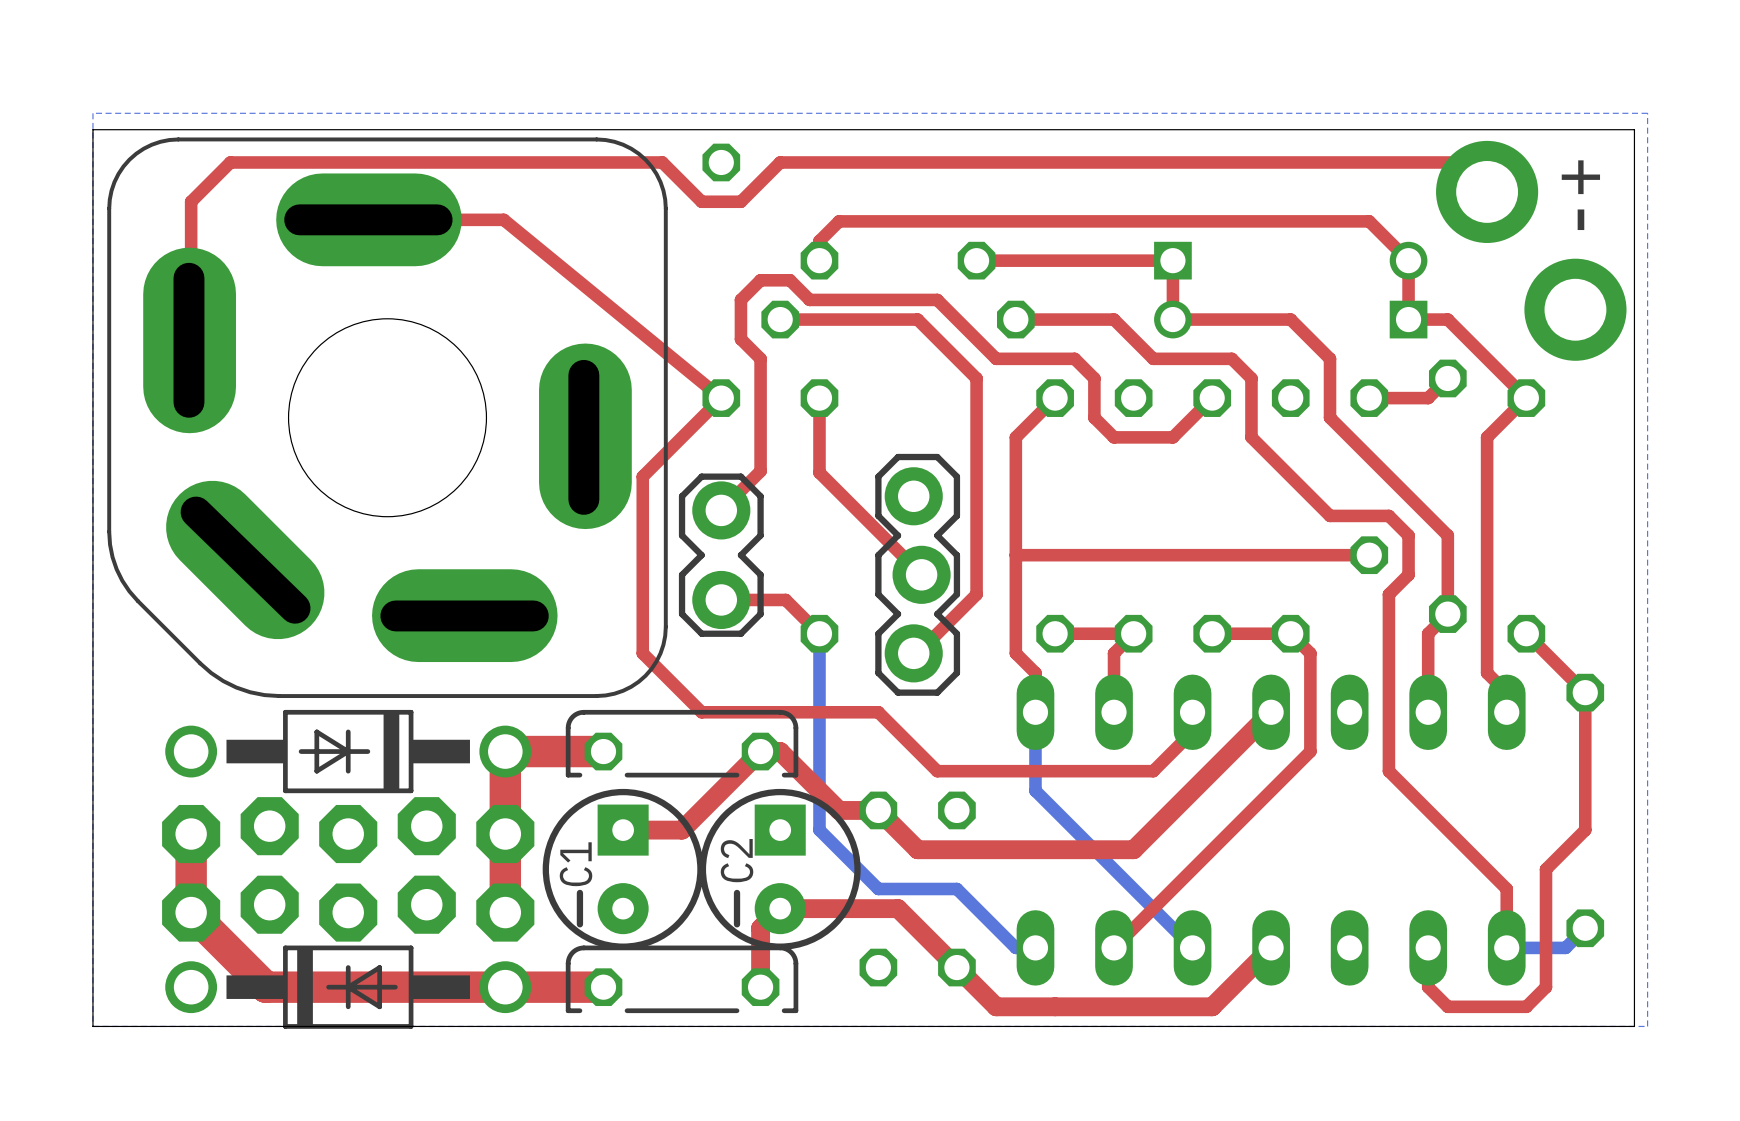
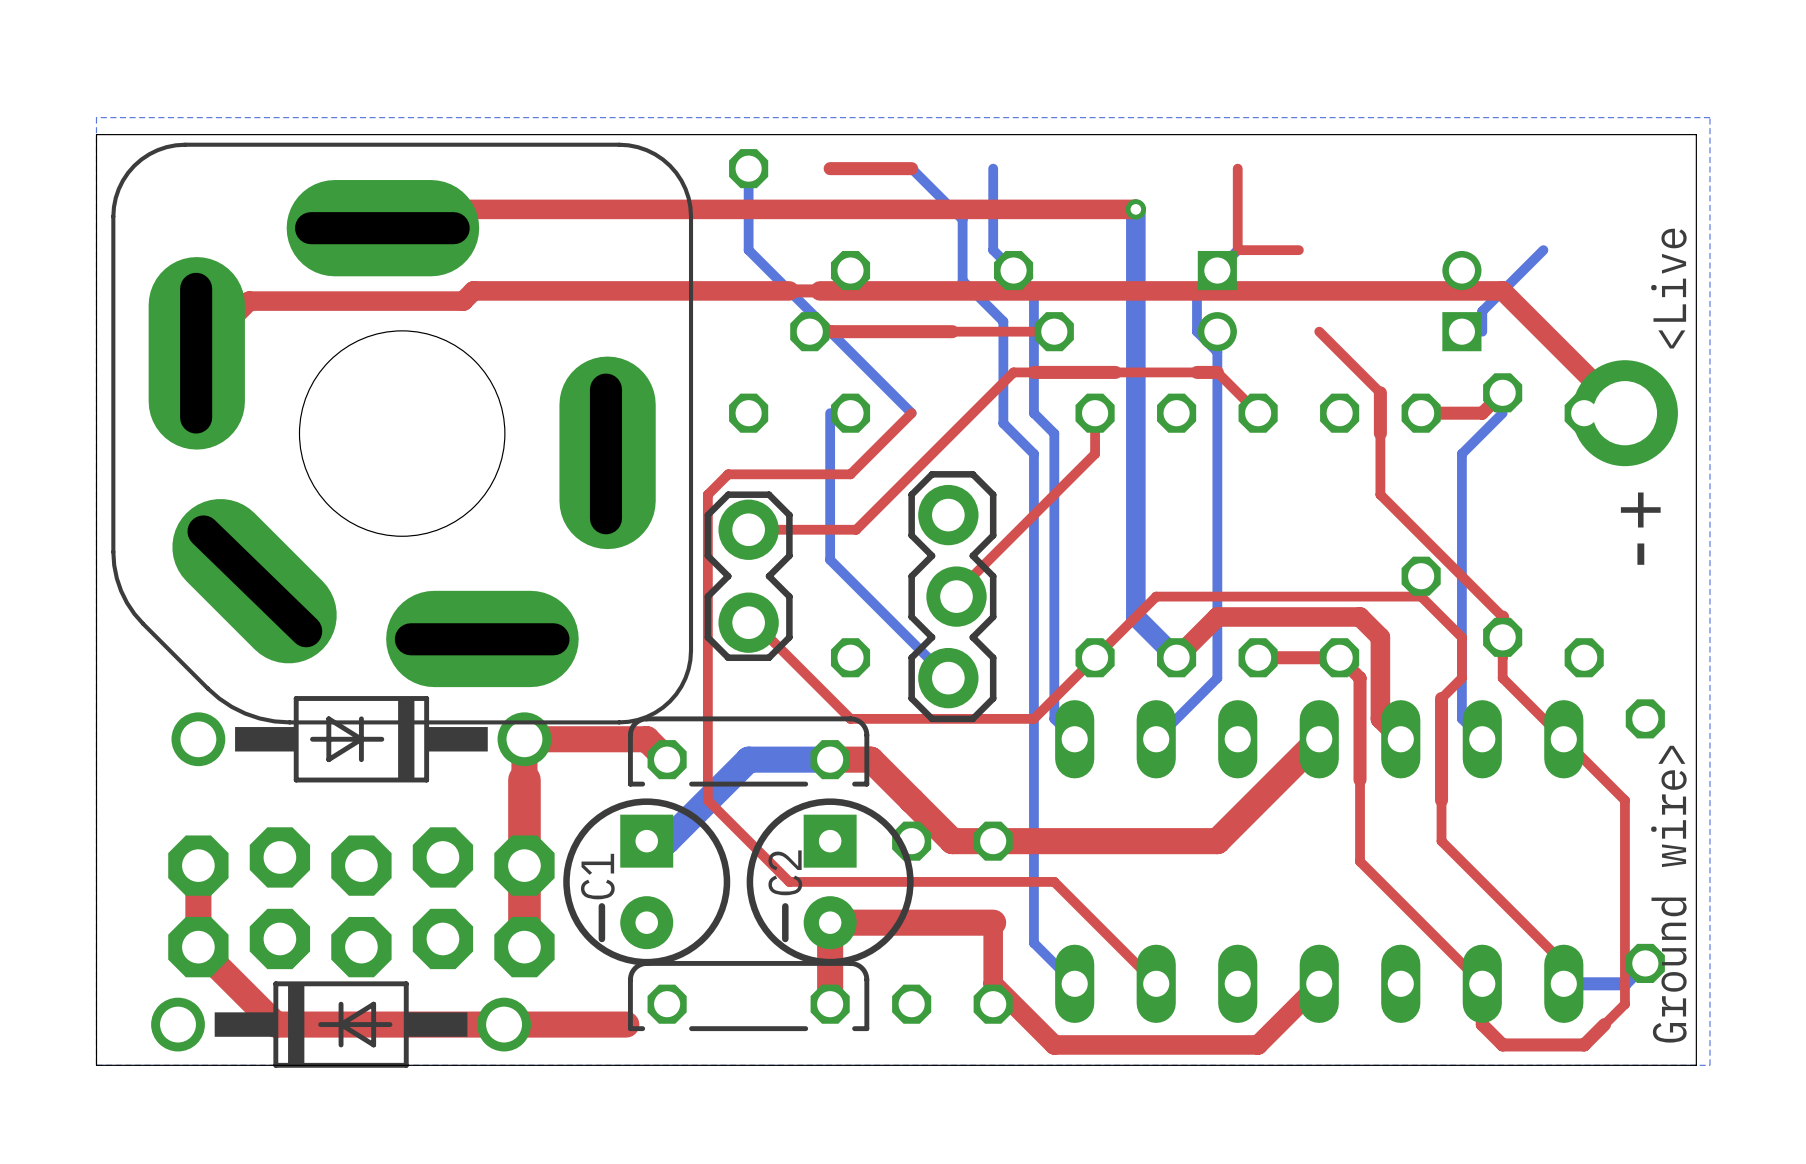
bottom track: none -> (748, 168) (748, 250) (911, 413)
top track: (799, 162) (780, 162) (740, 201) -> (1135, 209) (769, 209)
top track: (878, 162) (1457, 162) (1487, 191) -> none
top track: none -> (1237, 168) (1237, 250) (1298, 250)
part: (1487, 191) -> none
text position: -+ (1580, 195) -> -+ (1640, 528)
top track: (701, 201) (662, 162) (230, 162) (191, 201) (191, 338) (189, 340) -> (789, 290) (473, 290) (463, 301) (249, 301) (197, 353)
top track width: thin (701, 201) (740, 201) -> thick (728, 209) (769, 209)
bottom track: none -> (1135, 209) (1135, 616) (1176, 657)
via: none -> (1135, 209)
top track: (368, 219) (503, 219) (721, 398) (642, 476) (642, 653) (701, 712) (878, 712) (937, 771) (1153, 771) (1192, 731) (1192, 712) -> (383, 228) (402, 209) (728, 209)
bottom track: none -> (1237, 250) (1196, 290) (1196, 331) (1217, 352) (1217, 678) (1156, 739)
bottom track: none -> (1543, 250) (1482, 311) (1482, 331)
top track: (819, 260) (819, 241) (839, 221) (1369, 221) (1408, 260) (1408, 319) (1447, 319) (1526, 398) (1487, 437) (1487, 673) (1506, 692) (1506, 712) -> none
top track: (976, 260) (1172, 260) (1172, 319) (1290, 319) (1330, 358) (1330, 378) -> (1319, 331) (1380, 392)
text: none -> <Live (1668, 288)
top track: (760, 280) (740, 299) (740, 339) (760, 358) (760, 471) (721, 510) -> none
top track: (790, 280) (809, 299) (937, 299) (996, 358) -> (748, 529) (856, 529) (1013, 372) (1033, 372)
top track: none -> (819, 290) (1502, 290) (1624, 413)
part position: (1575, 309) -> (1624, 413)
top track: (917, 319) (976, 378) (976, 594) (917, 653) (913, 653) -> (952, 331) (1033, 331)
top track: (1015, 319) (1114, 319) (1153, 358) -> (1115, 372) (1196, 372)
top track: (1074, 358) (1094, 378) (1094, 417) (1114, 437) (1172, 437) (1212, 398) -> (1217, 372) (1258, 413)
top track: (1172, 358) (1231, 358) (1251, 378) (1251, 437) (1330, 515) (1388, 515) (1408, 535) (1408, 574) (1388, 594) (1388, 673) -> (754, 622) (850, 718) (1033, 718) (1156, 596) (1421, 596) (1461, 637) (1461, 678) (1441, 698)
bottom track: none -> (830, 413) (830, 559) (948, 678)
top track: (819, 398) (819, 472) (921, 574) -> none
top track: (1055, 398) (1015, 437) (1015, 653) (1035, 673) (1035, 712) -> (1095, 413) (1095, 453) (952, 596) (956, 596)
bottom track: none -> (1502, 413) (1461, 453) (1461, 718) (1482, 739)
top track: (1330, 417) (1447, 535) (1447, 594) -> (1380, 433) (1380, 494) (1502, 616)
top track: (1015, 555) (1369, 555) -> none
top track: (726, 599) (785, 599) (819, 633) -> none
top track: (1447, 614) (1428, 633) (1428, 712) -> none
bottom track: (819, 633) (819, 830) (878, 888) (956, 888) (1015, 947) (1035, 947) -> (911, 168) (962, 219) (962, 280) (1003, 321) (1003, 423) (1033, 453) (1033, 943) (1074, 983)
top track: (1055, 633) (1133, 633) (1114, 653) (1114, 712) -> none
top track: none -> (1176, 657) (1217, 616) (1360, 616) (1380, 637) (1380, 718) (1400, 739)
top track: (1526, 633) (1585, 692) (1585, 830) (1546, 869) (1546, 987) -> (1502, 637) (1502, 678) (1624, 800) (1624, 1004) (1604, 1024)
bottom track: (1035, 712) (1035, 790) (1192, 947) -> (1074, 739) (1054, 718) (1054, 433) (1033, 413) (1033, 290) (993, 250) (993, 168)
top track width: thin (1271, 712) (1172, 810) -> thick (1319, 739) (1217, 841)
top track: none -> (830, 759) (870, 759) (952, 841) (1217, 841)
bottom track: none -> (830, 759) (748, 759) (667, 841) (646, 841)
part position: (682, 743) -> (748, 751)
part position: (348, 751) -> (361, 739)
top track: (505, 751) (603, 751) -> (524, 780) (524, 739) (646, 739) (667, 759)
top track: (1310, 751) (1114, 947) -> (1360, 780) (1360, 861) (1482, 983)
top track: (1388, 771) (1506, 888) (1506, 928) -> (1441, 800) (1441, 841) (1563, 963)
top track: (1172, 810) (1133, 849) (1015, 849) -> (1156, 983) (1054, 881)
top track: (623, 830) (682, 830) (760, 751) (780, 751) (839, 810) (878, 810) (917, 849) -> (911, 413) (850, 474) (728, 474) (707, 494) (707, 800) (789, 881) (952, 881)
top track width: thick (191, 834) (191, 912) (265, 987) (603, 987) -> thin (198, 865) (198, 947) (275, 1024) (626, 1024)
top track width: thick (917, 849) (1015, 849) -> thin (952, 881) (1054, 881)
text: none -> Ground wire> (1668, 894)
C1 position: (623, 869) -> (646, 881)
C2 position: (780, 869) -> (830, 881)
part position: (682, 979) -> (748, 996)
part position: (348, 987) -> (341, 1024)
top track: (760, 987) (760, 928) (780, 908) (898, 908) (996, 1006) (1015, 1006) -> (830, 1004) (830, 922) (993, 922) (993, 983) (1054, 1044)

